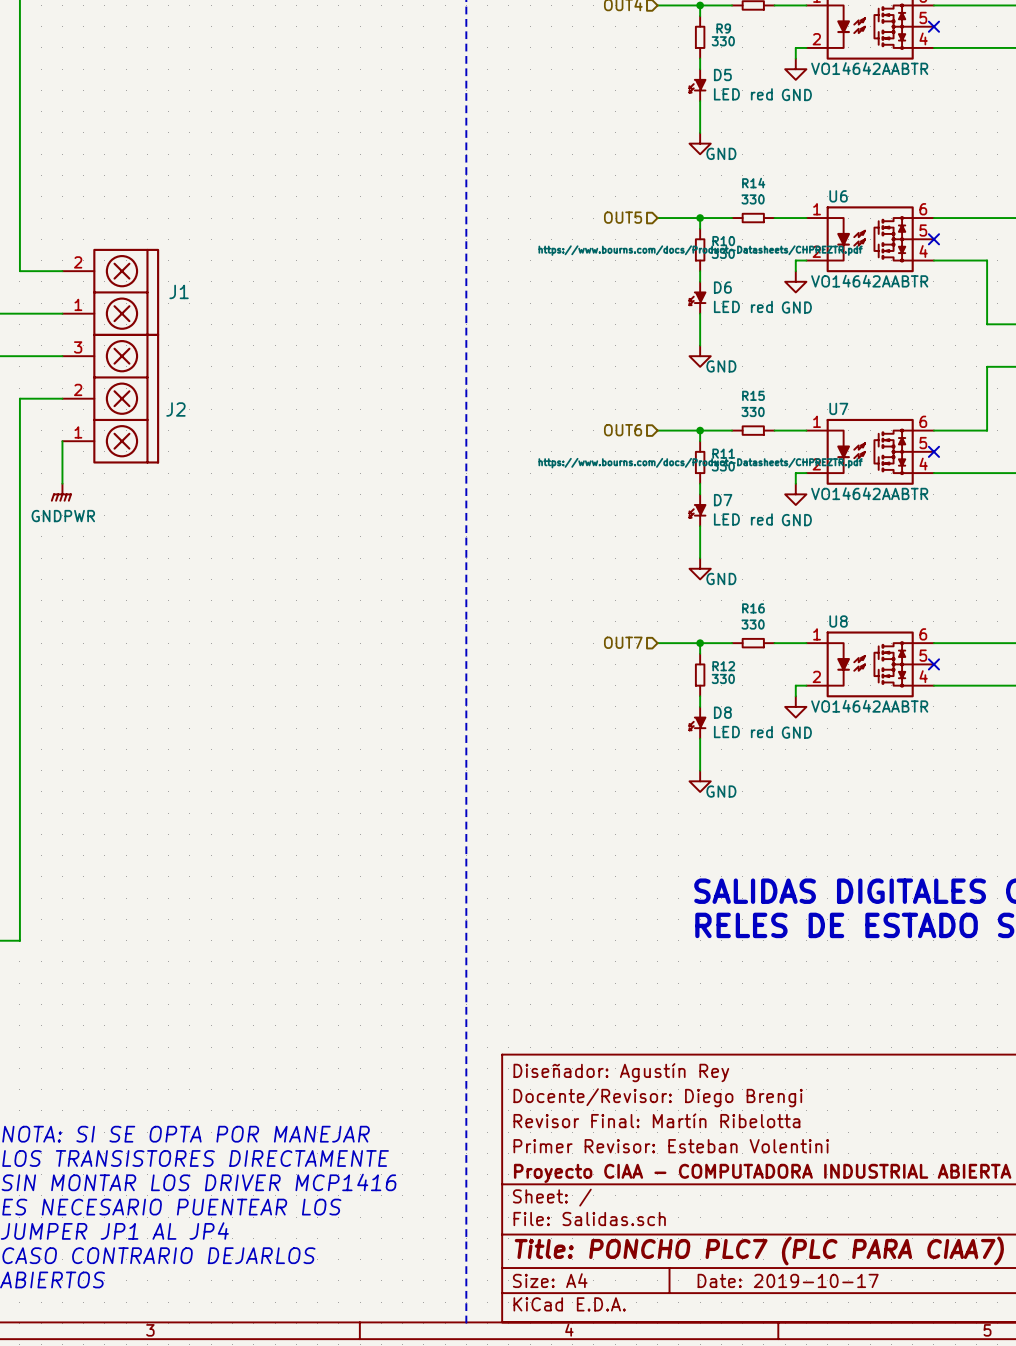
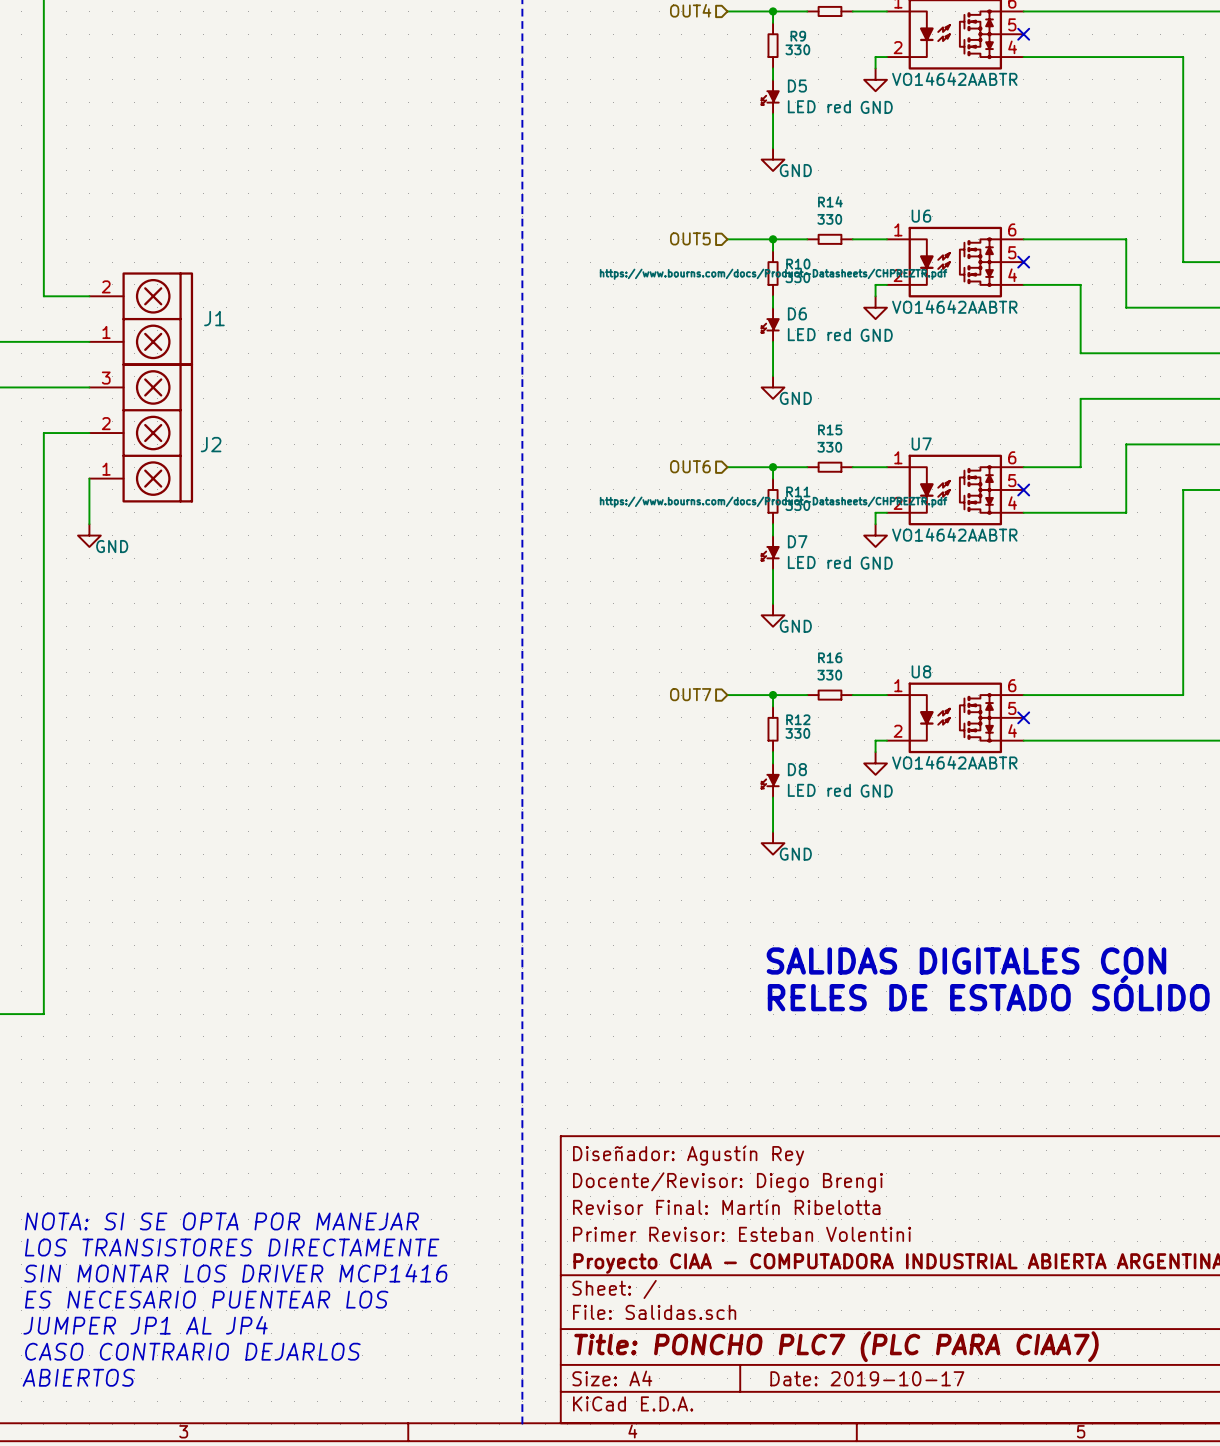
power symbol: GNDPWR (61, 492) -> GND (89, 535)

